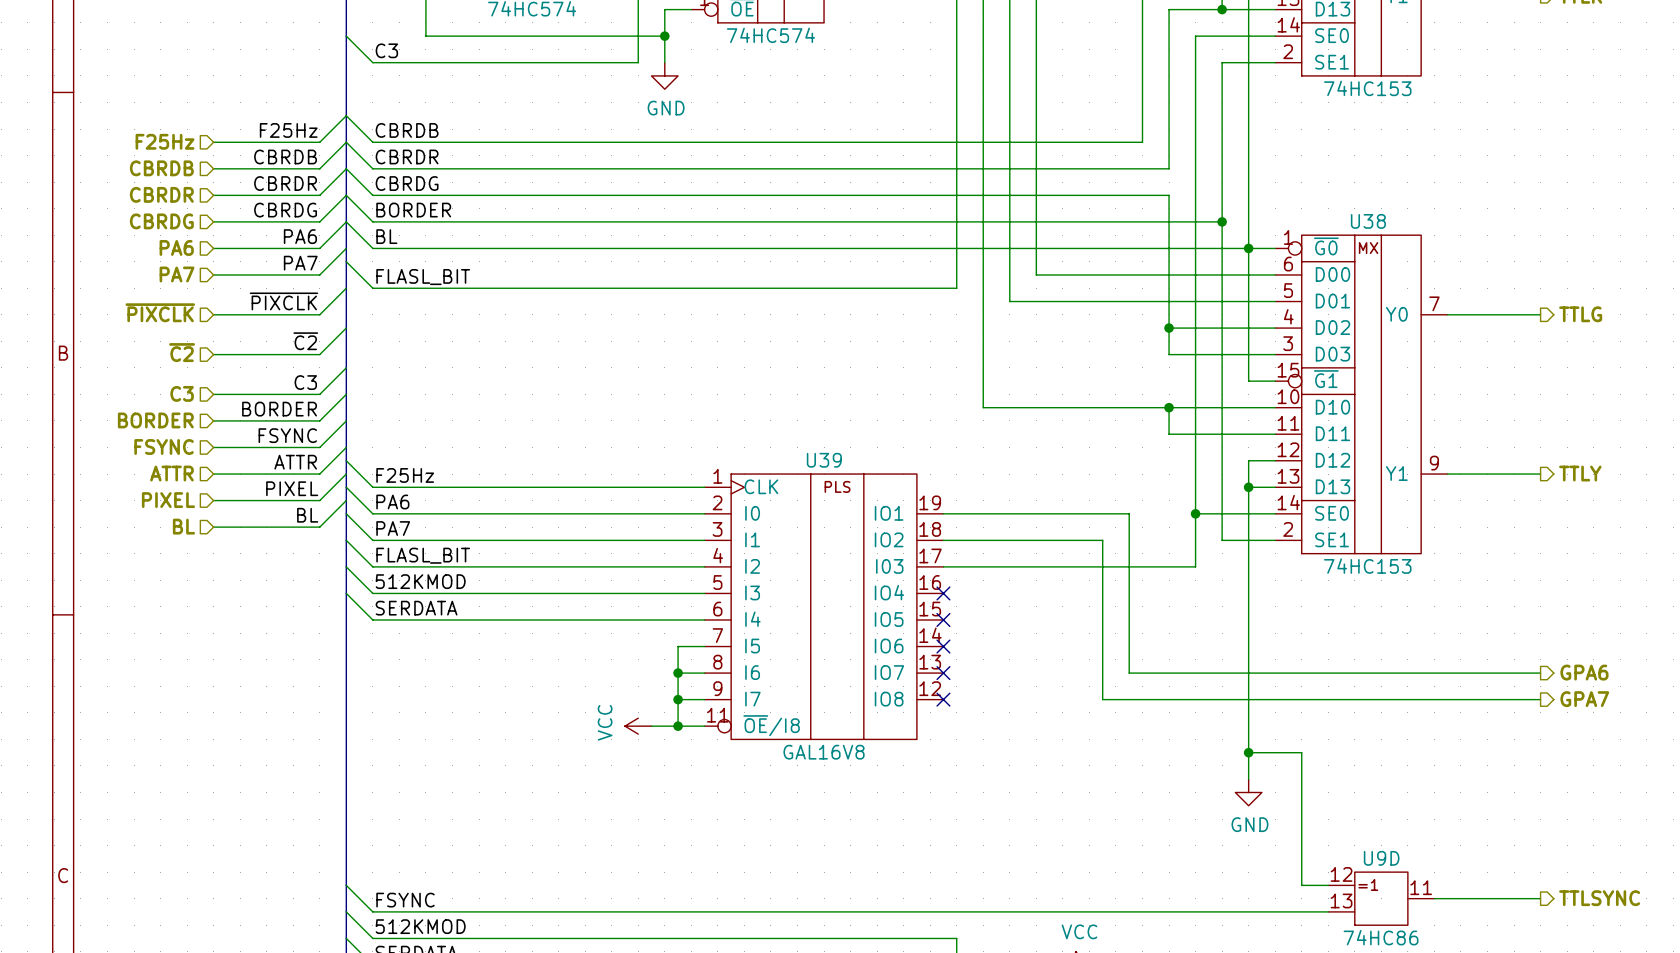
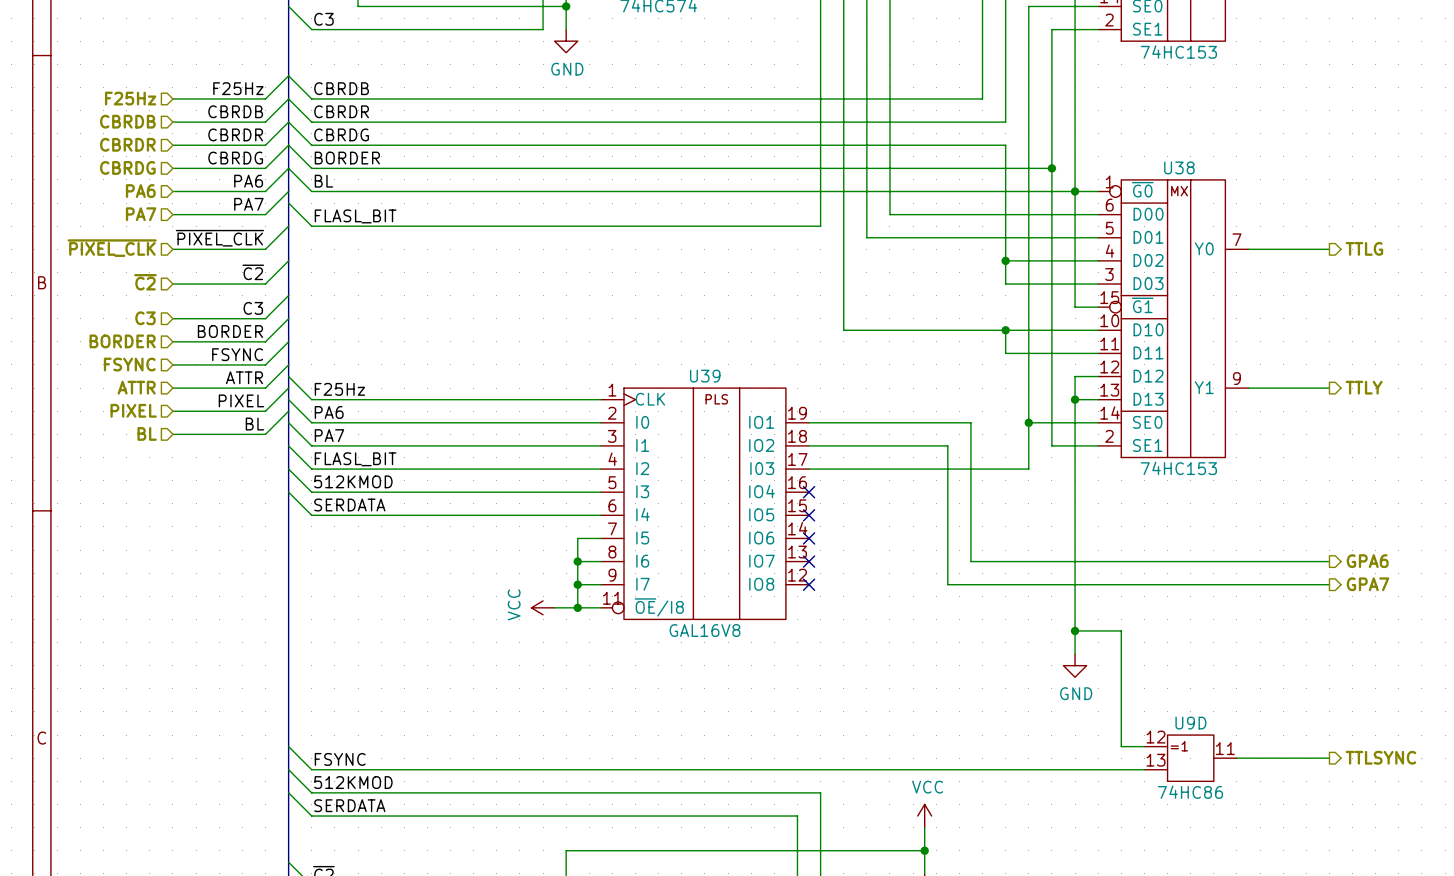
label: ~{PIXCLK} (283, 301) -> ~{PIXEL_CLK} (219, 238)
hierarchical label: ~{PIXCLK} (160, 312) -> ~{PIXEL_CLK} (112, 248)

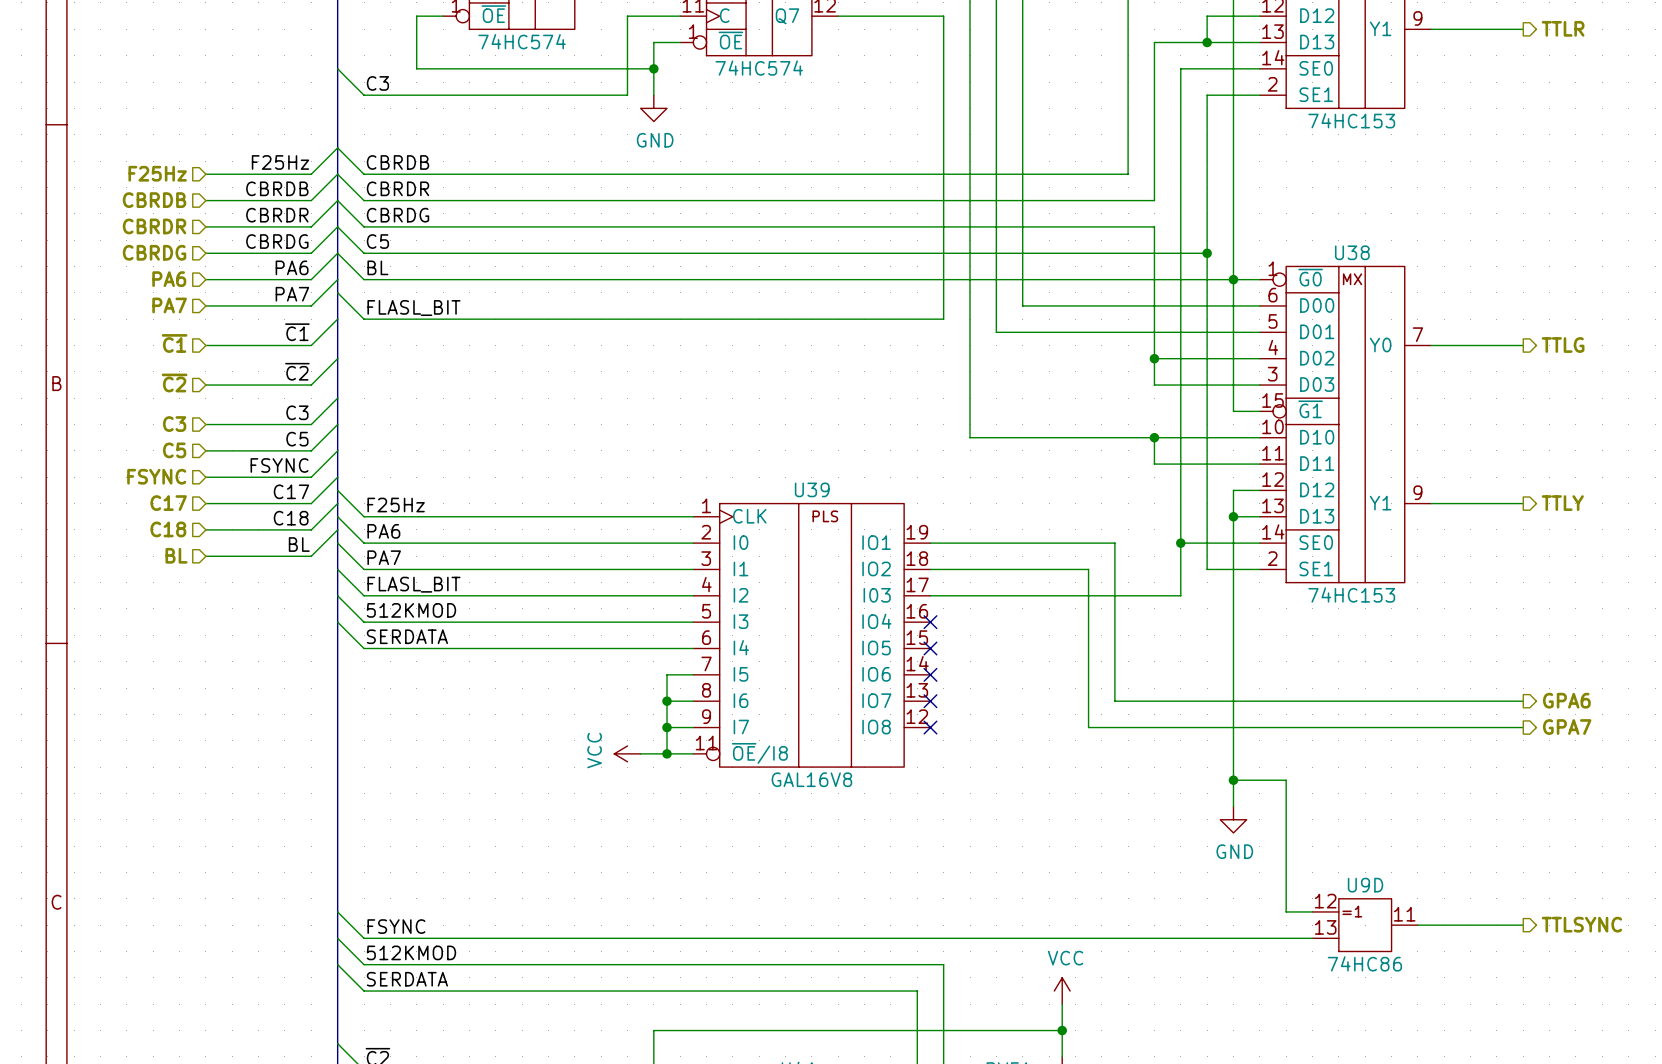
label: BORDER (347, 158) -> C5 (377, 241)
label: ~{PIXEL_CLK} (219, 238) -> ~{C1} (297, 332)
hierarchical label: ~{PIXEL_CLK} (112, 248) -> ~{C1} (174, 343)
label: BORDER (230, 331) -> C5 (297, 439)
hierarchical label: BORDER (122, 341) -> C5 (174, 450)
label: ATTR (244, 377) -> C17 (291, 491)
hierarchical label: ATTR (136, 387) -> C17 (168, 503)
label: PIXEL (241, 400) -> C18 (291, 518)
hierarchical label: PIXEL (133, 410) -> C18 (168, 529)

